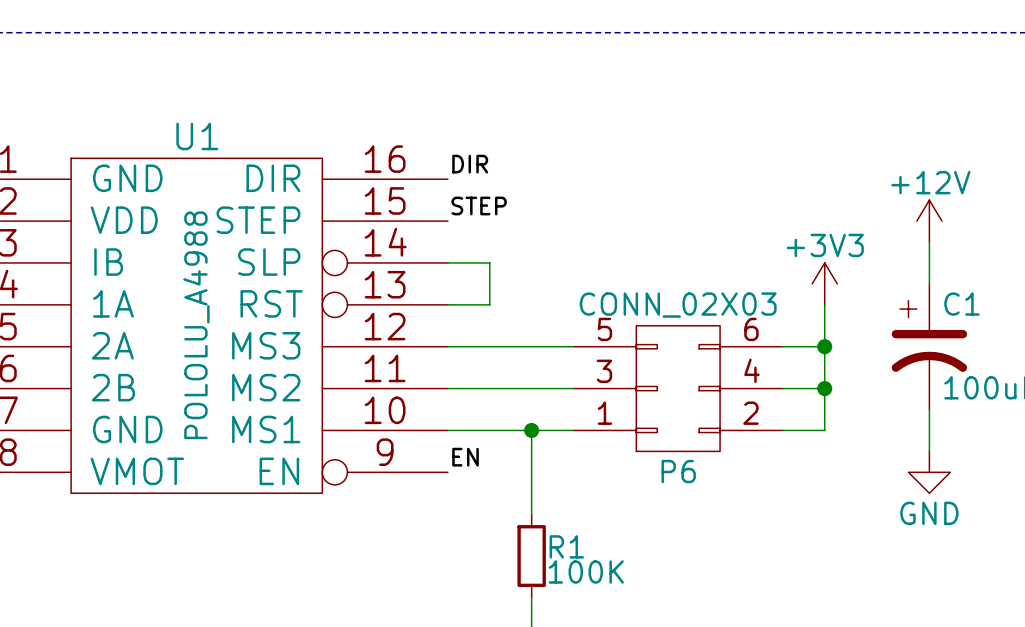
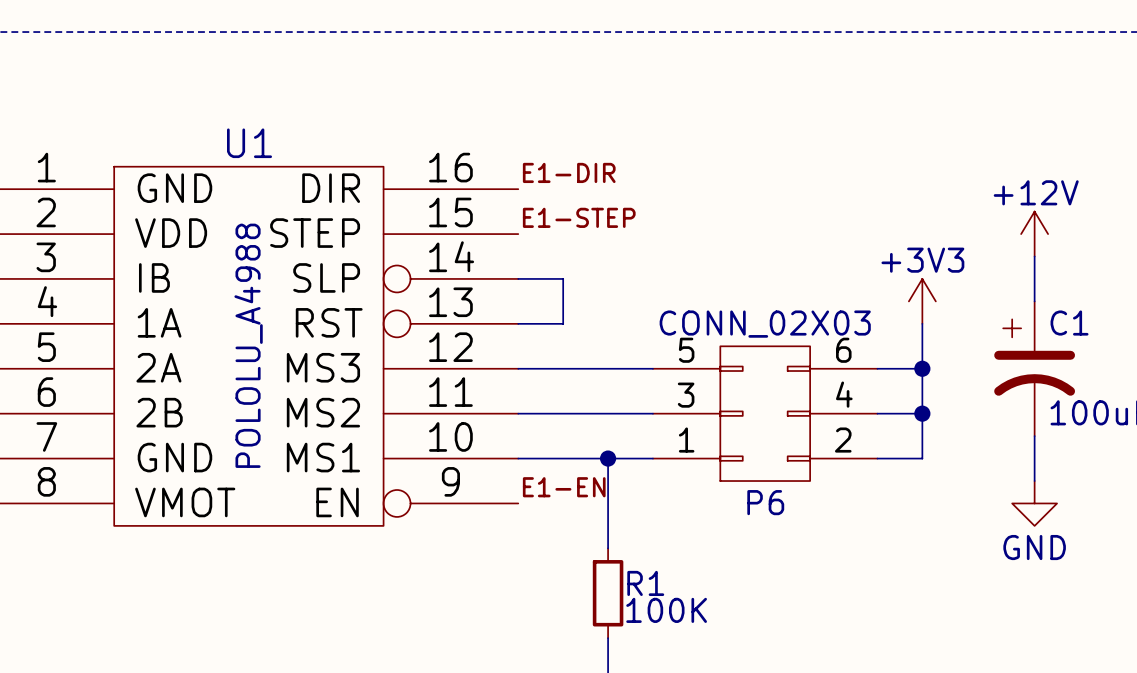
label: DIR (470, 164) -> E1-DIR (569, 172)
label: STEP (479, 205) -> E1-STEP (579, 217)
label: EN (465, 457) -> E1-EN (564, 487)

